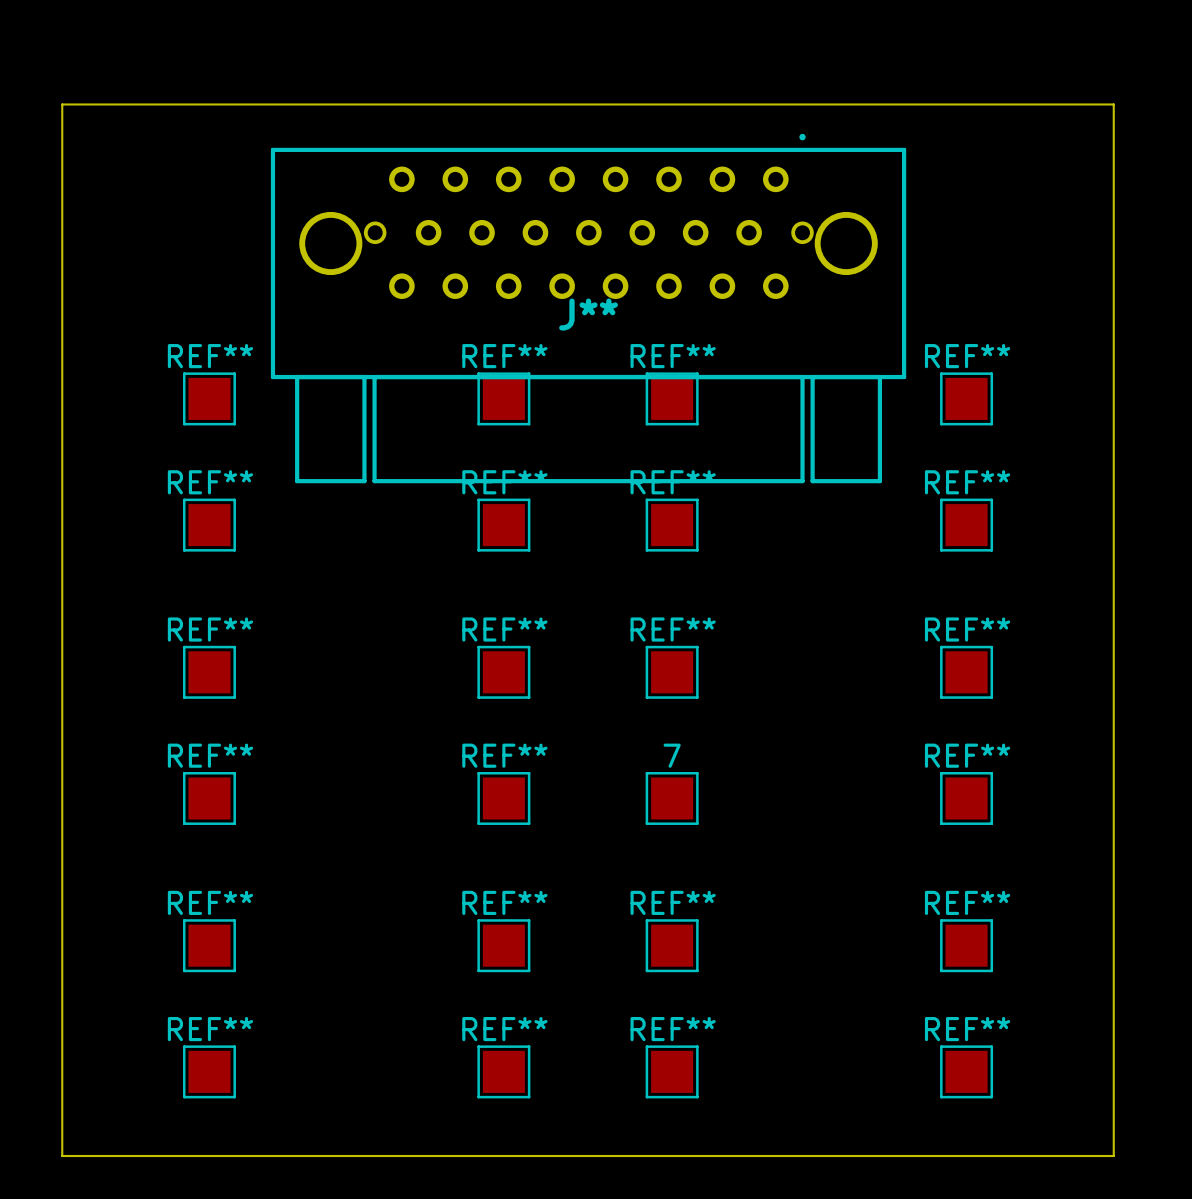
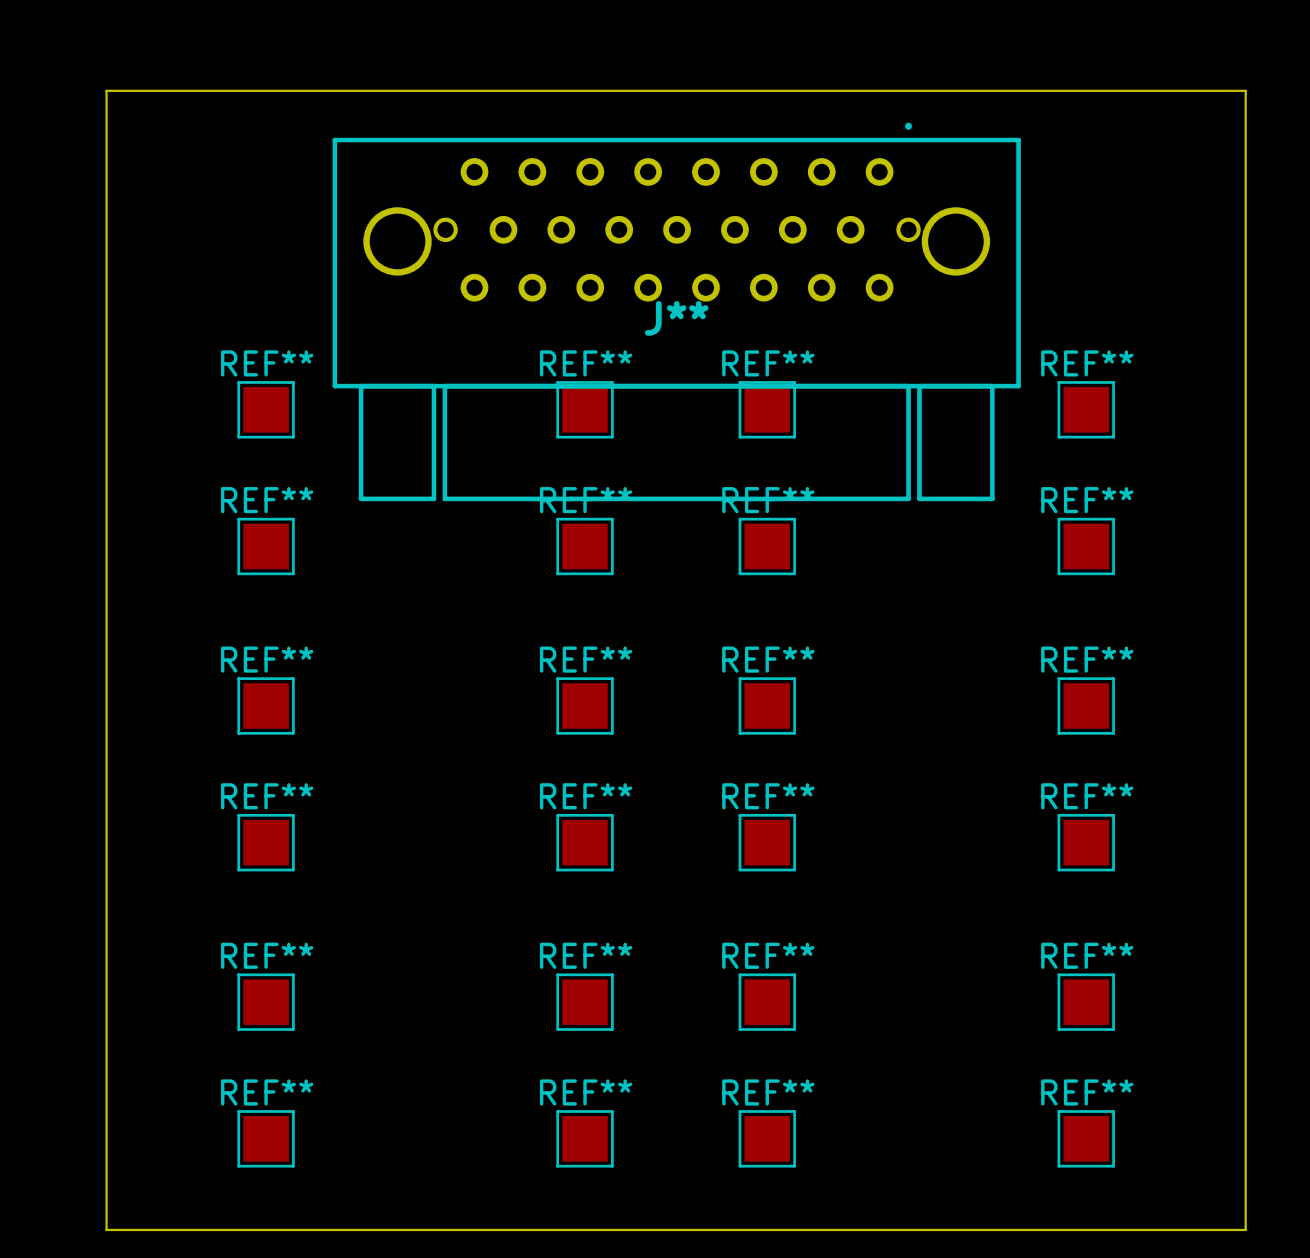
7 name: 7 (672, 755) -> REF** (768, 796)

